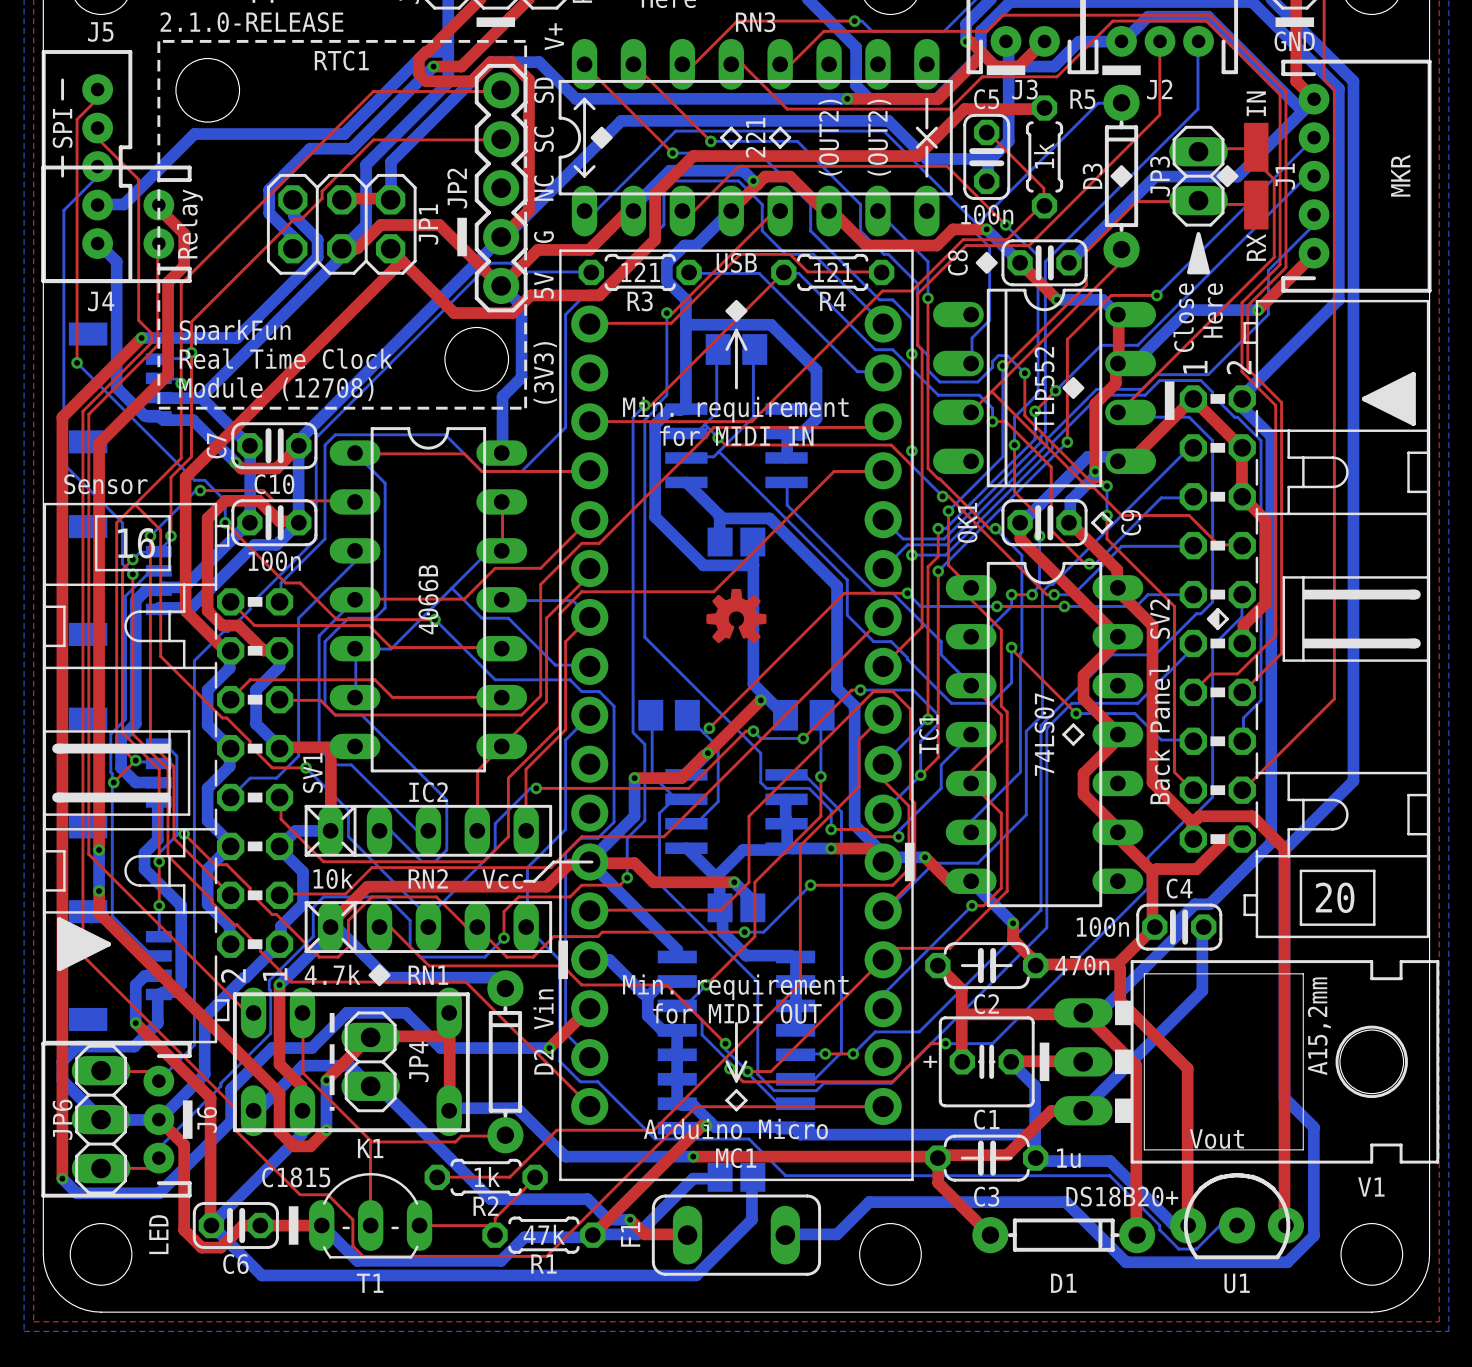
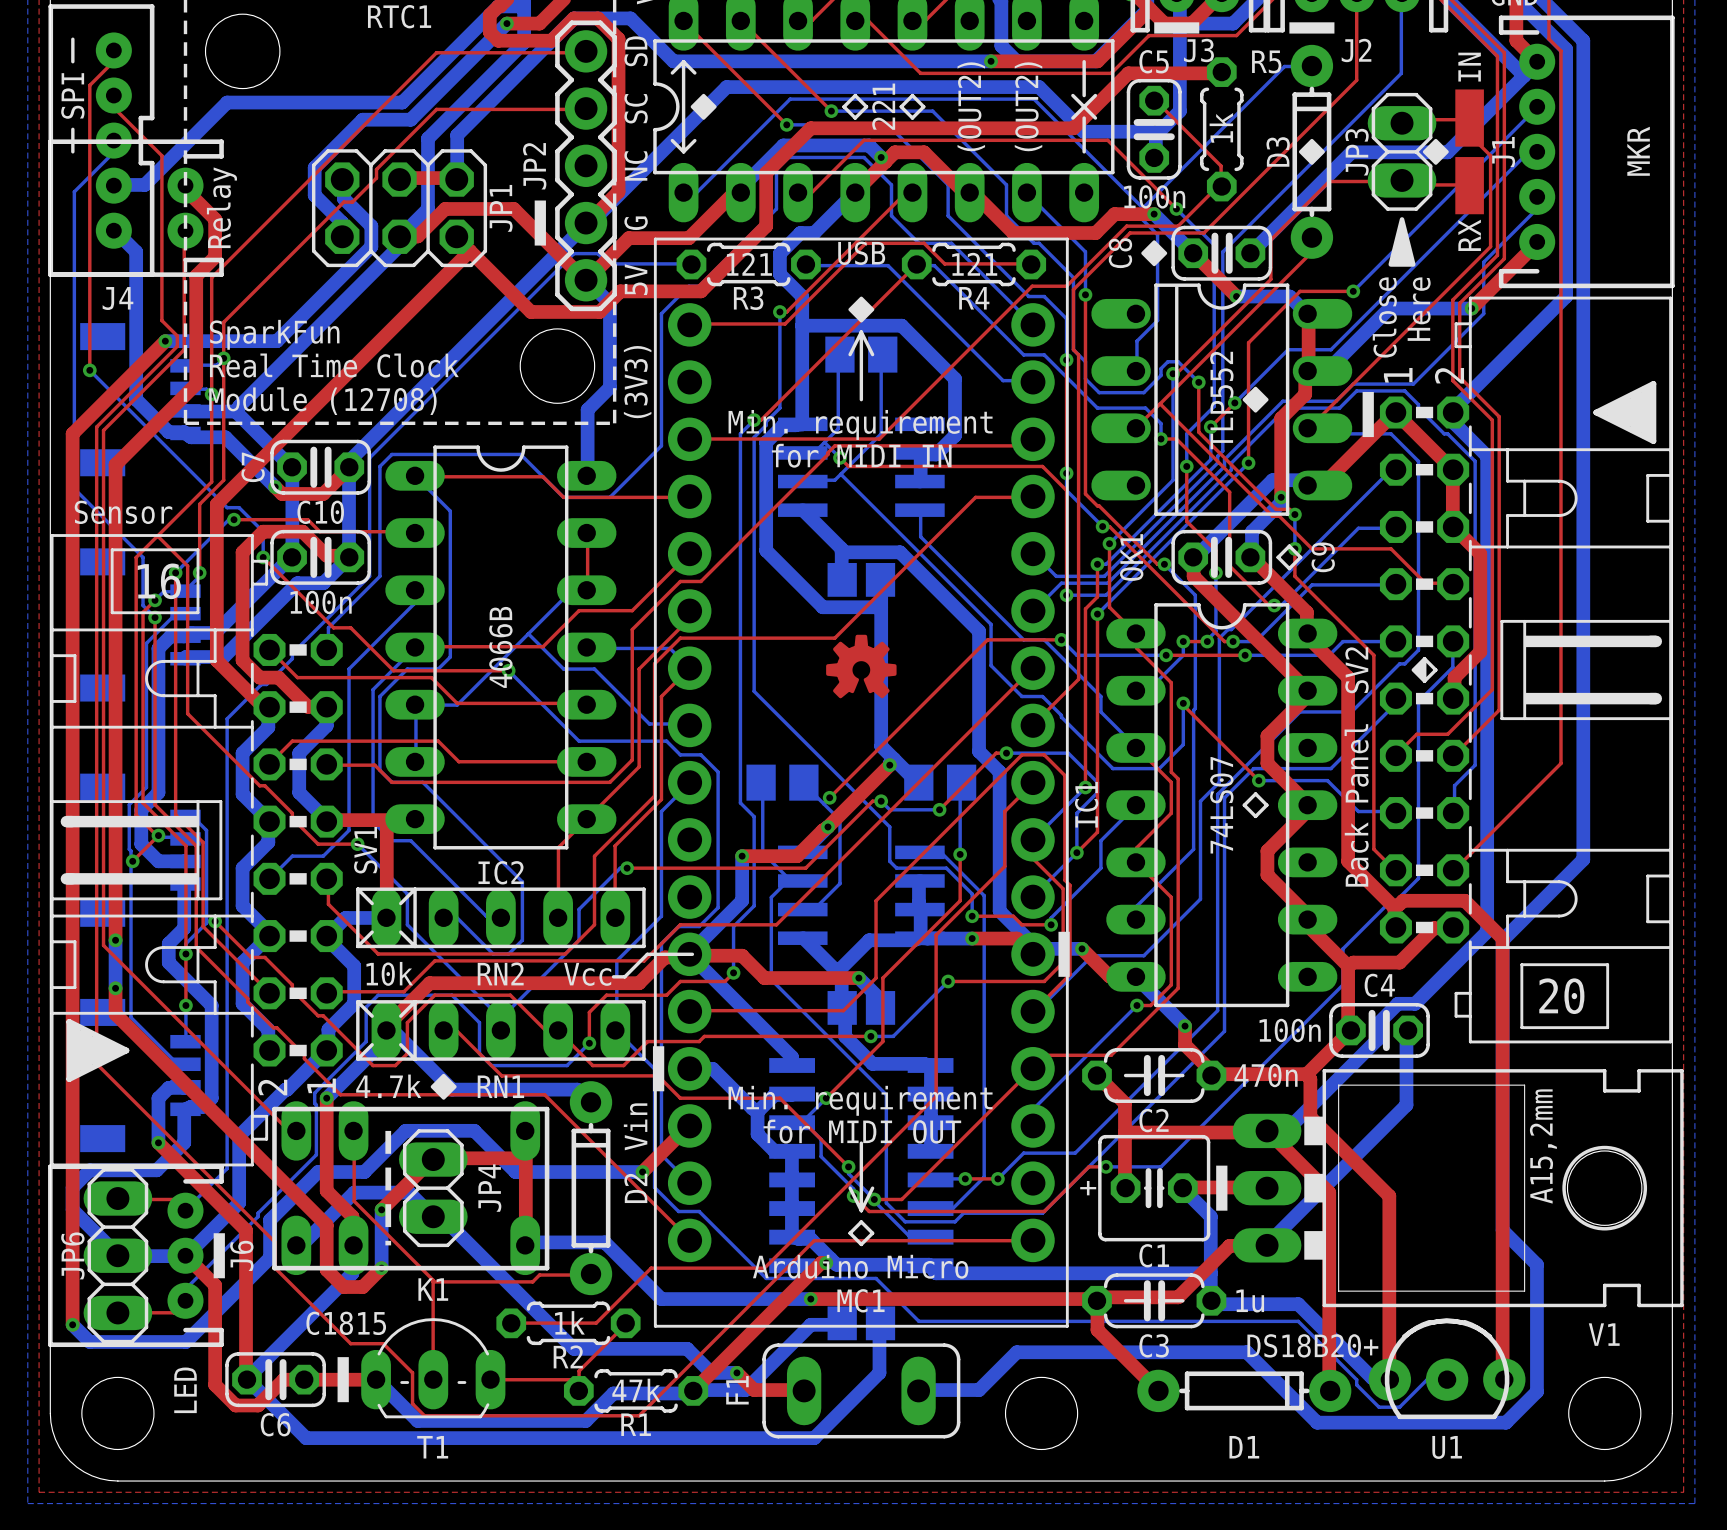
text: Vout (1216, 1139) -> none

